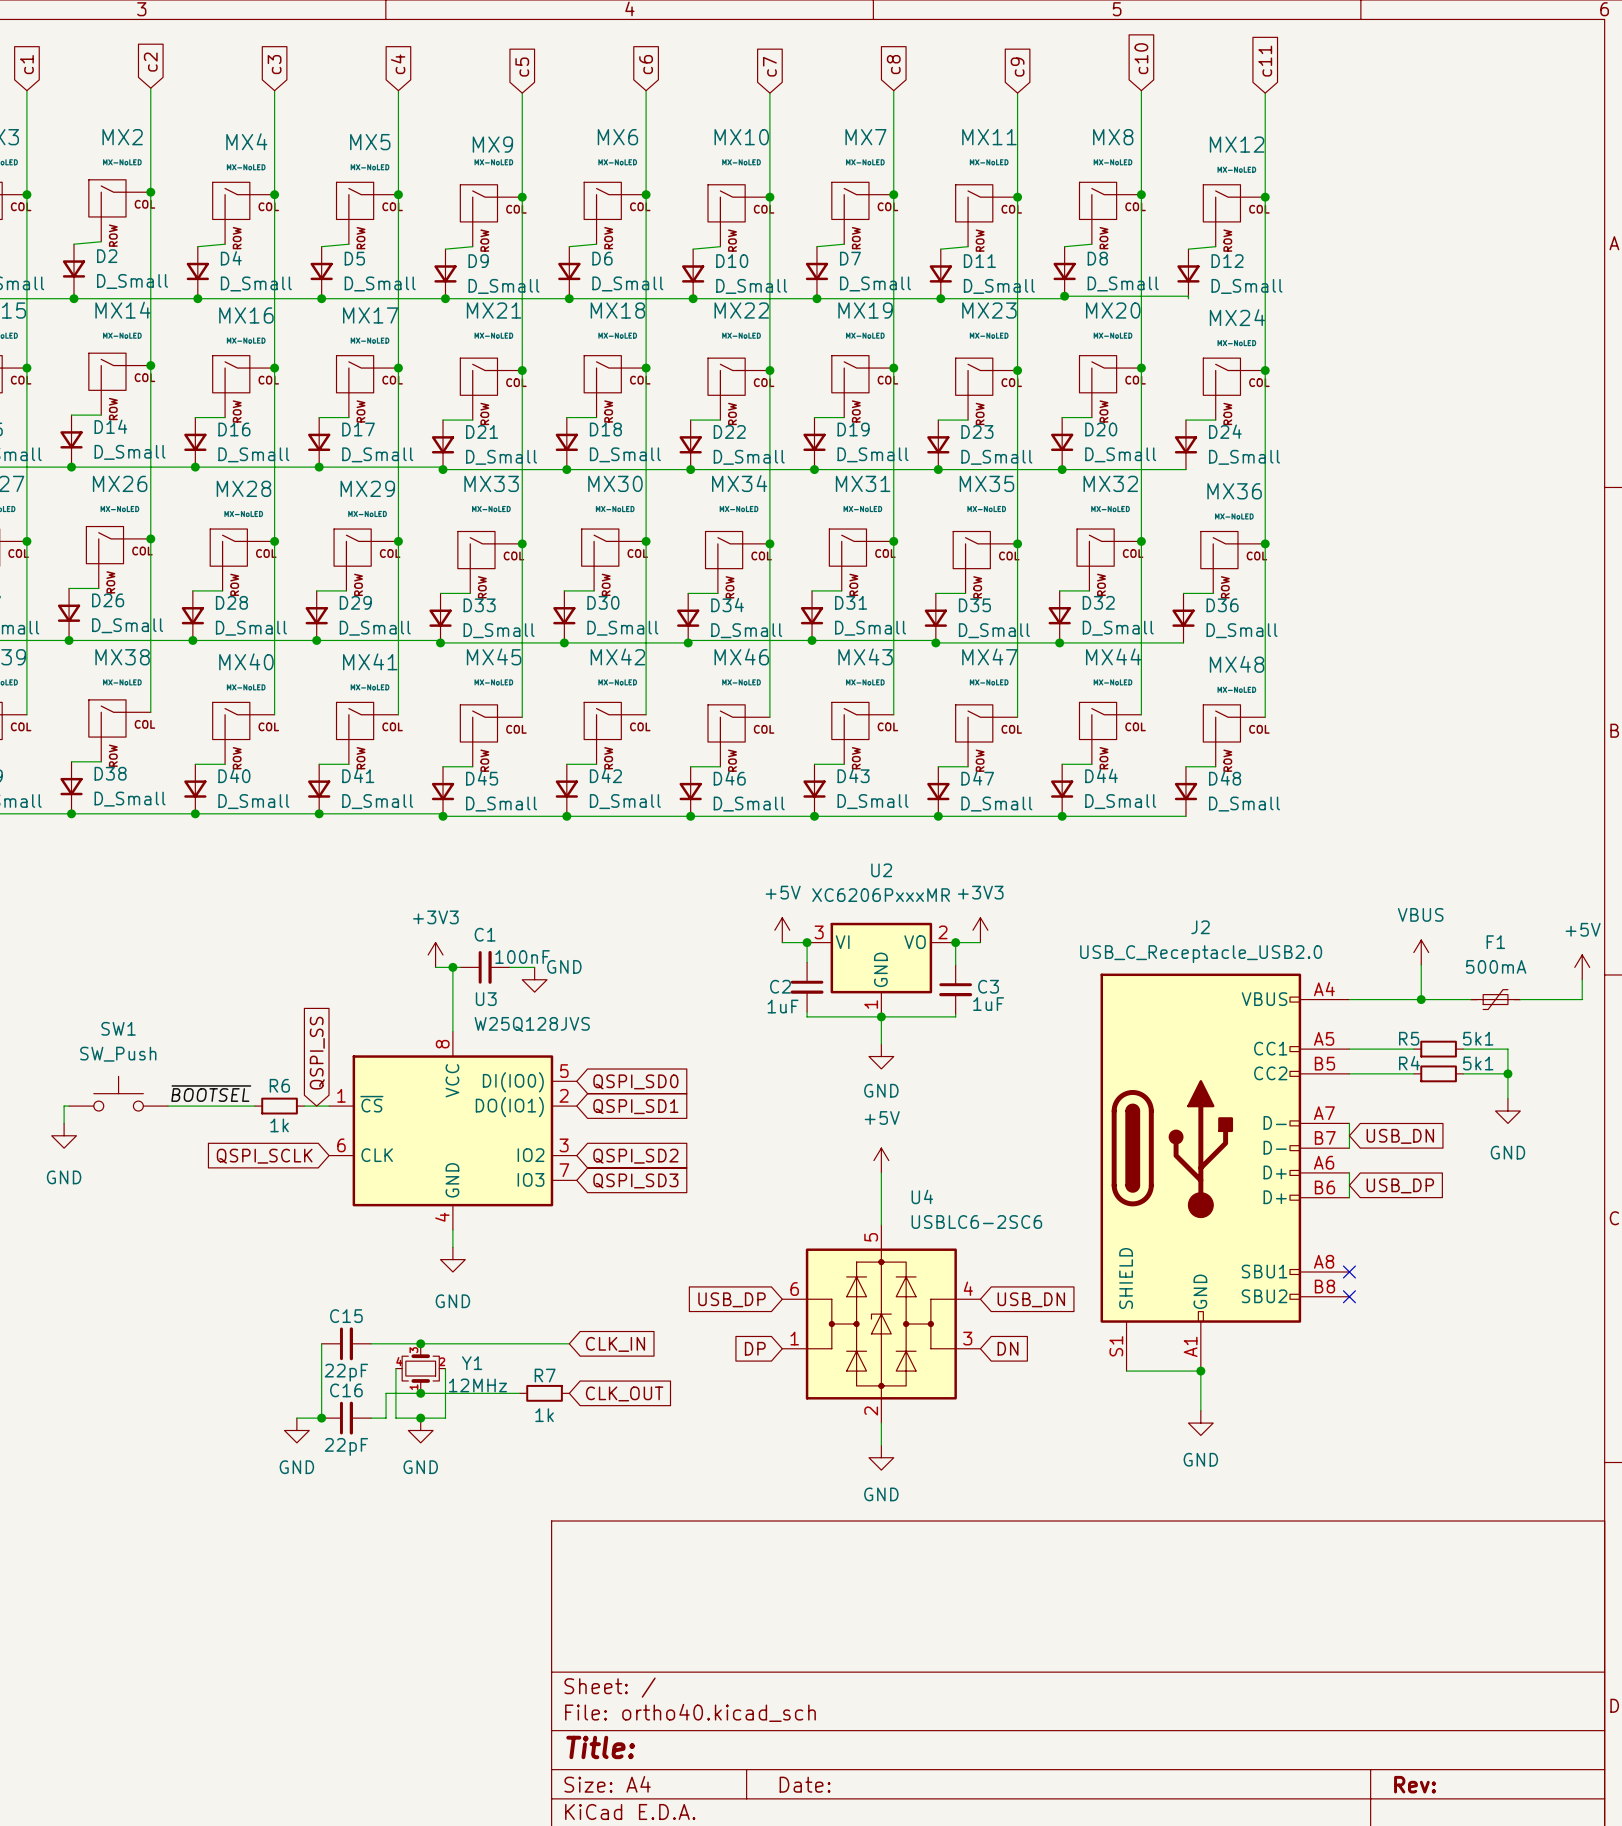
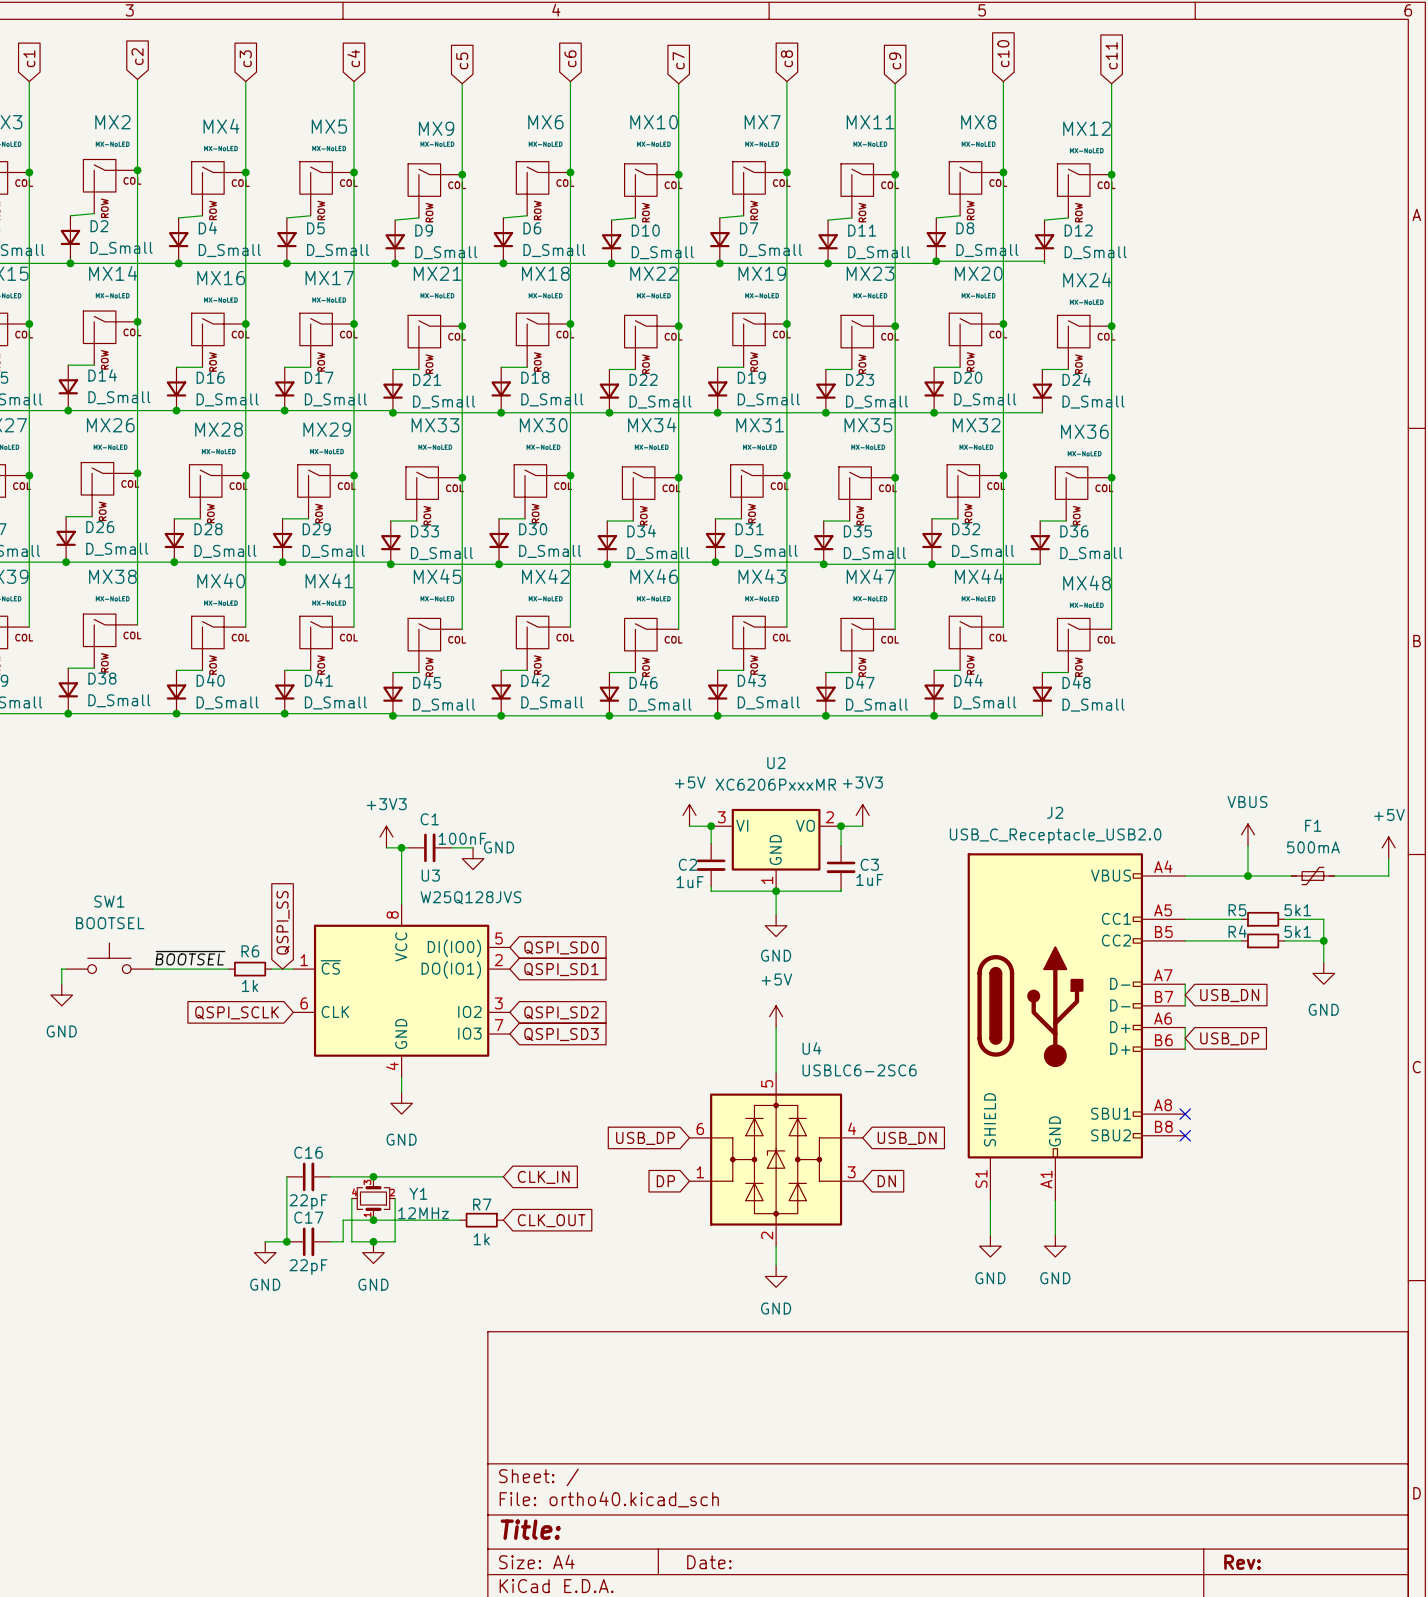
SW1 value: SW_Push (118, 1054) -> BOOTSEL (110, 923)
C15 name: C15 (346, 1316) -> C16 (308, 1152)
wire: (1126, 1371) (1200, 1371) -> (990, 1200) (990, 1235)
junction: (1200, 1371) -> none
C16 name: C16 (346, 1390) -> C17 (308, 1217)
power symbol: none -> GND (990, 1246)

